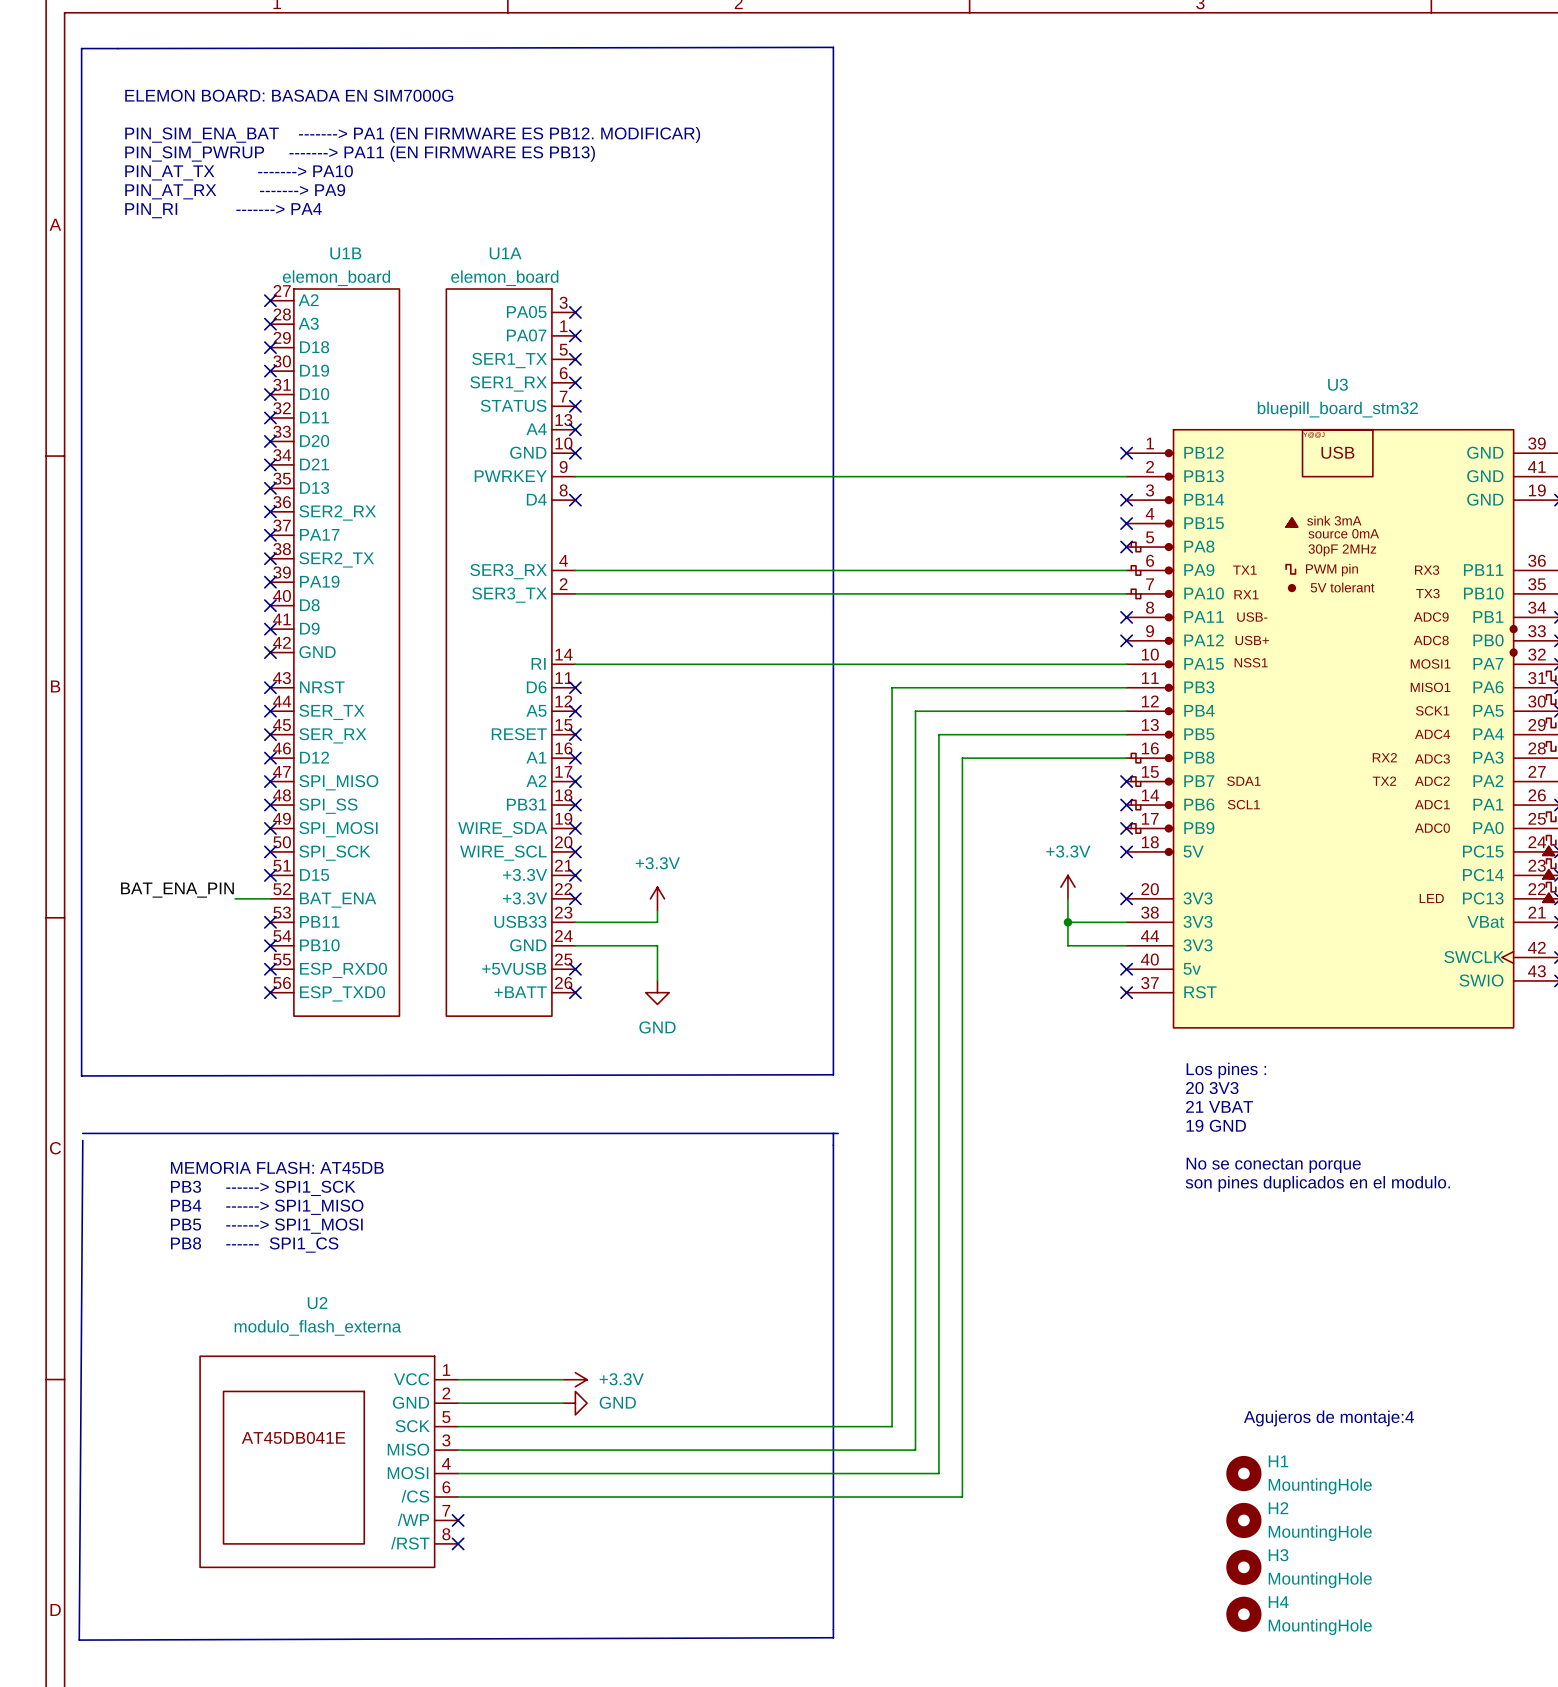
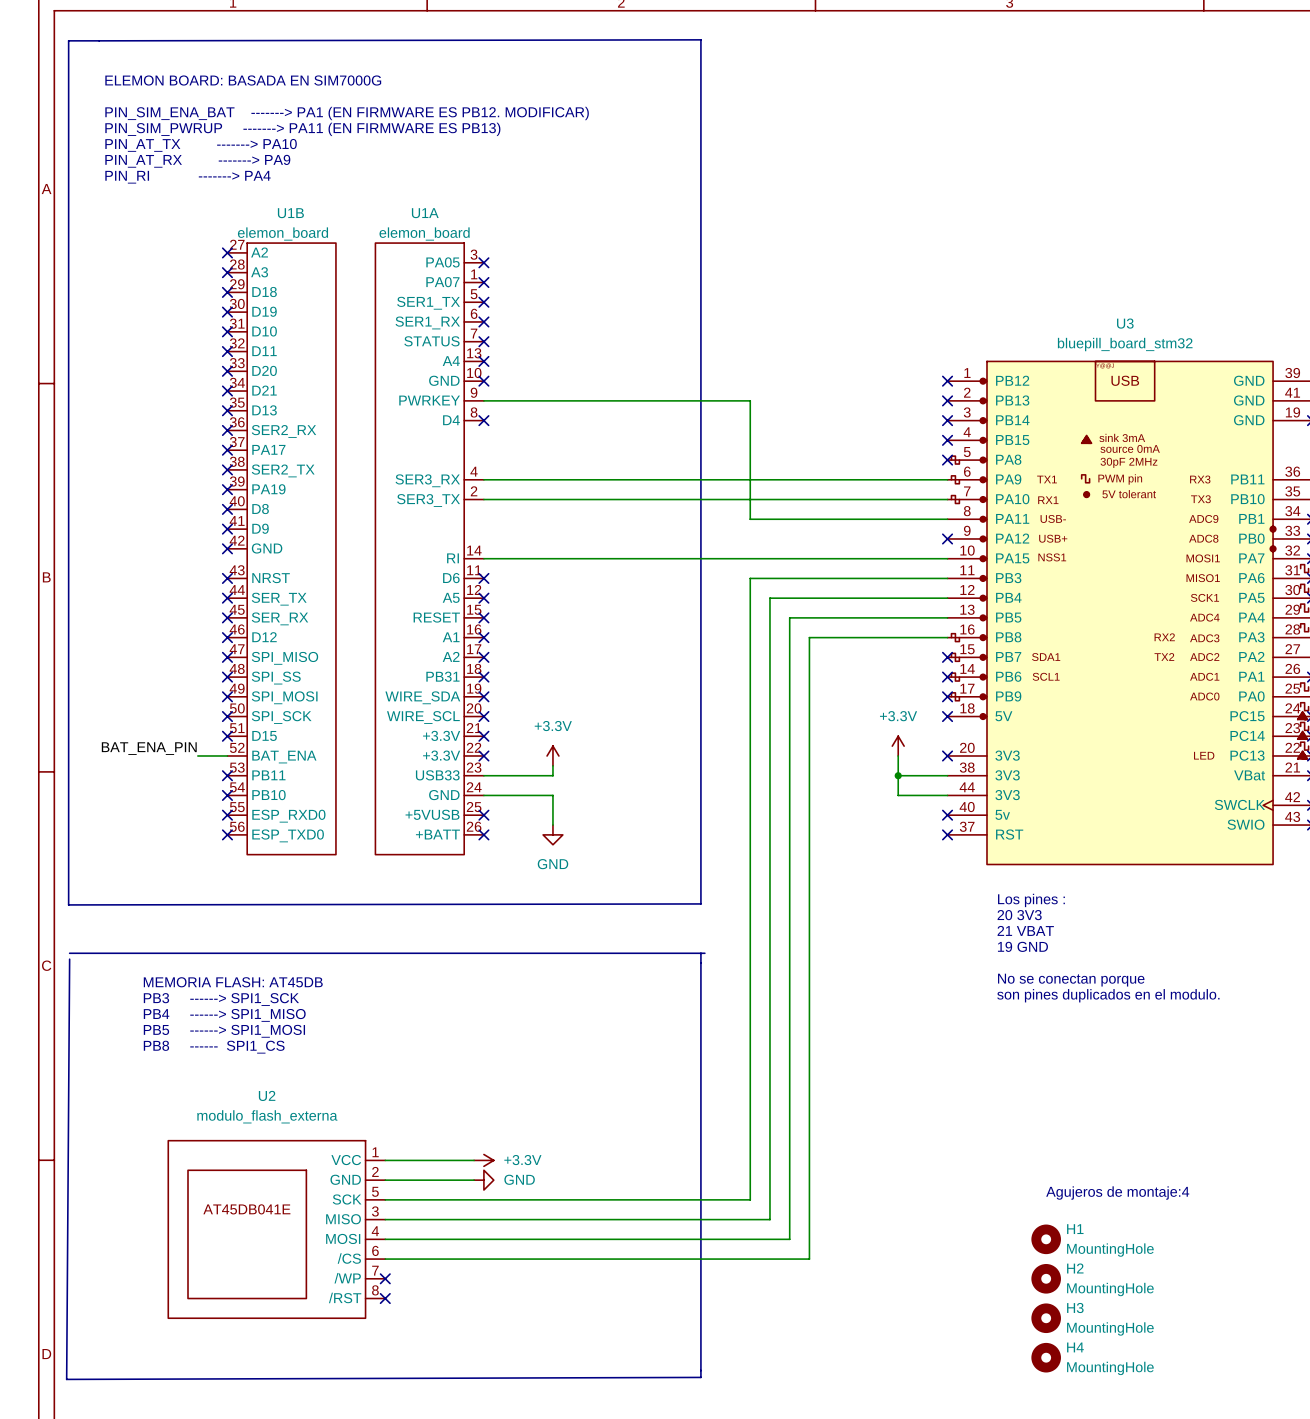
wire: (892, 476) (1126, 476) -> (750, 400) (750, 519) (947, 519)
no-connect mark: none -> (947, 400)
no-connect mark: (1126, 617) -> none

